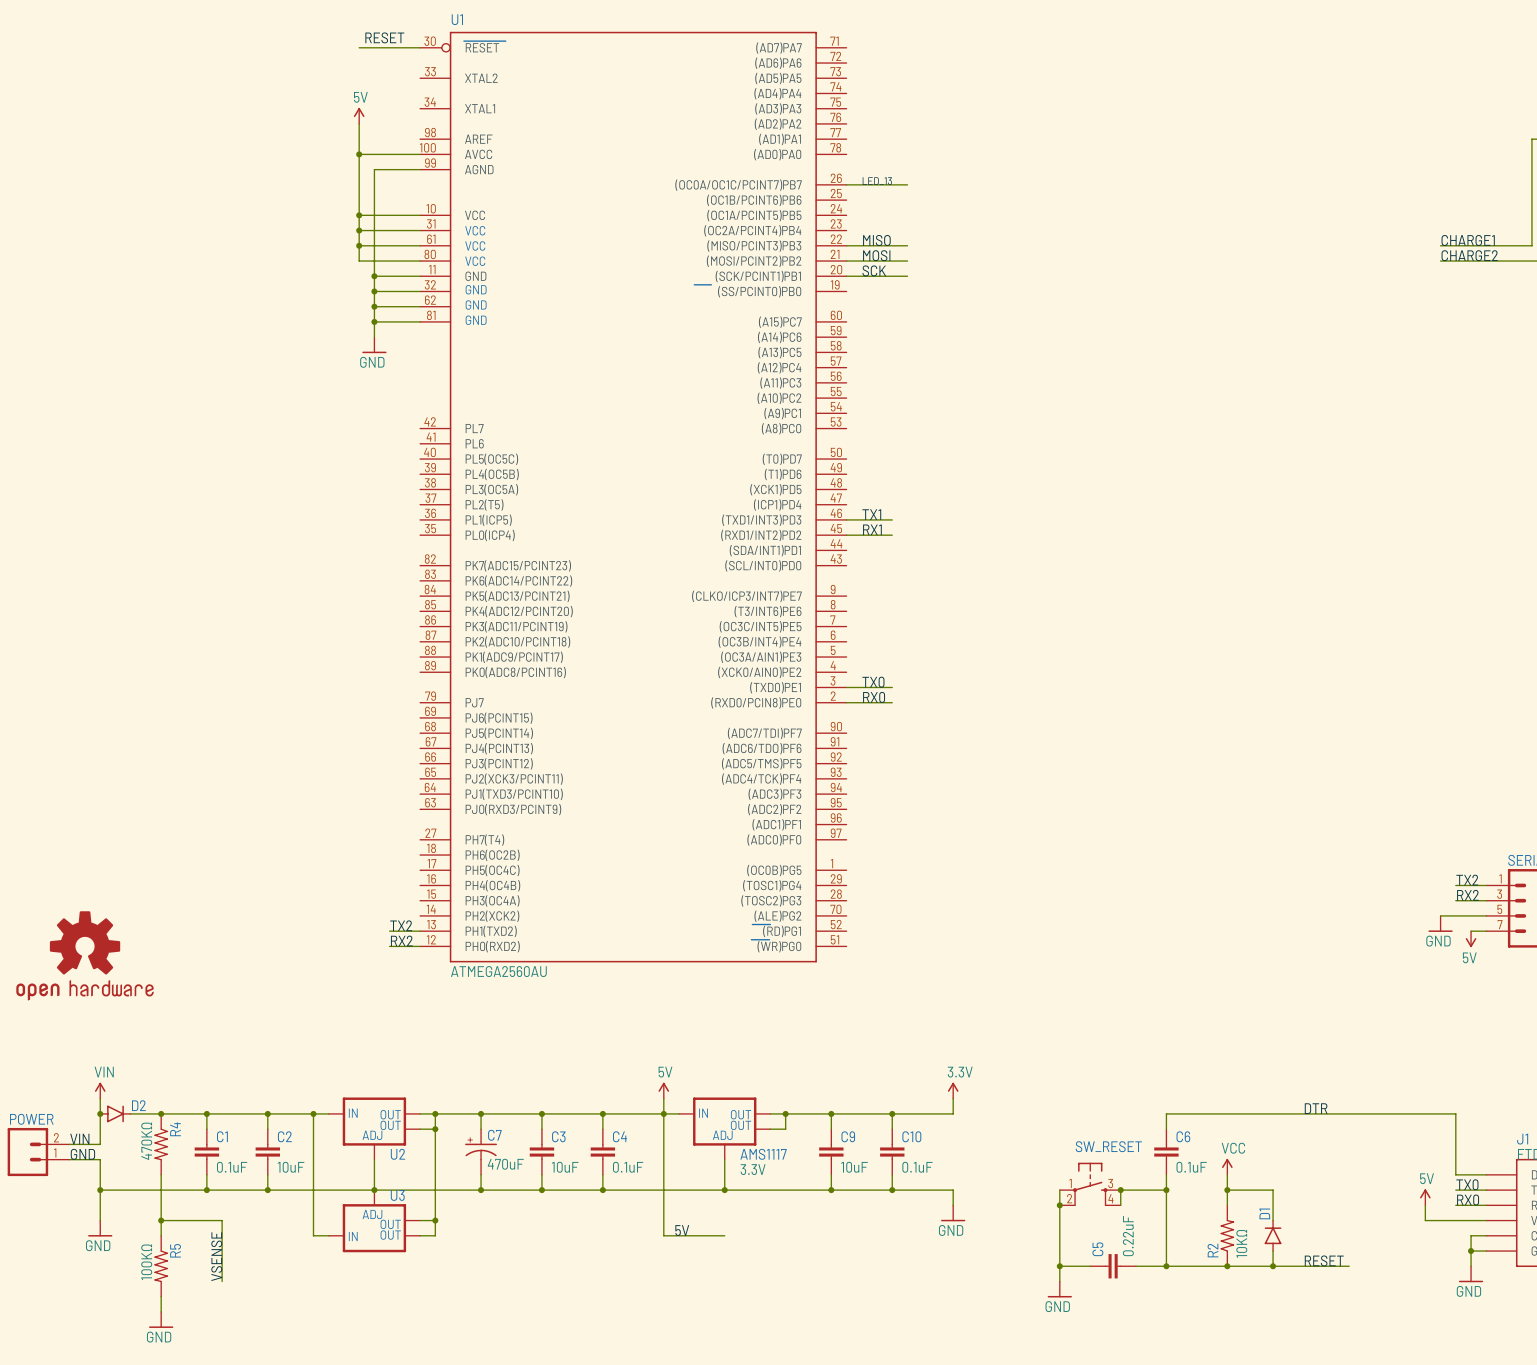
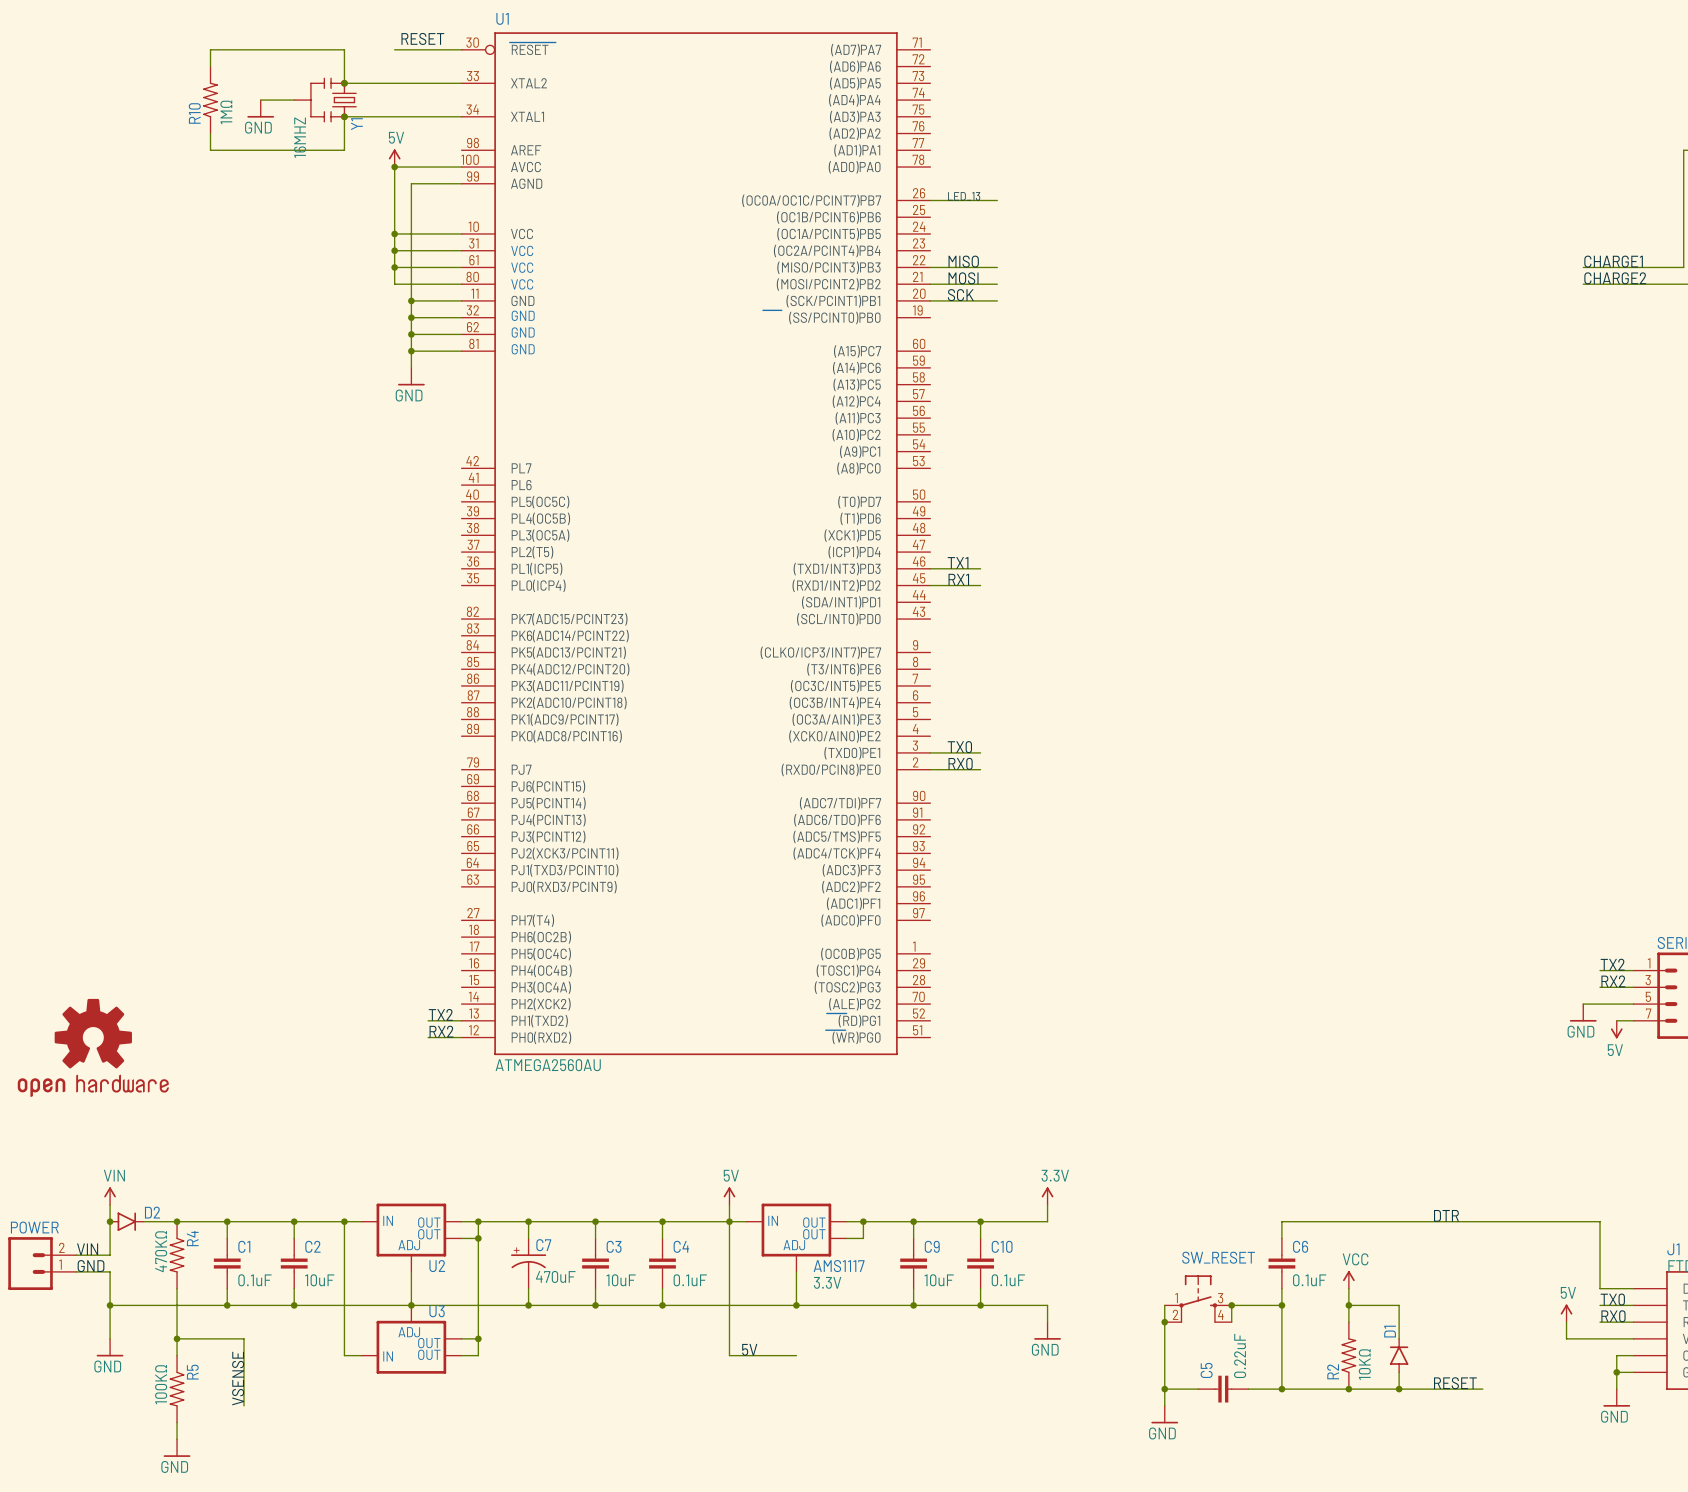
wire: none -> (210, 66) (210, 49) (344, 49) (344, 83) (461, 83)
junction: none -> (344, 83)
R10: none -> 1MΩ (210, 100)
wire: none -> (260, 100) (294, 100)
Y1: none -> 16MHZ (325, 100)
power symbol: none -> GND (260, 108)
junction: none -> (344, 116)
wire: none -> (461, 116) (344, 116) (344, 150) (210, 150) (210, 133)
power symbol position: 5V (359, 115) -> 5V (394, 158)

